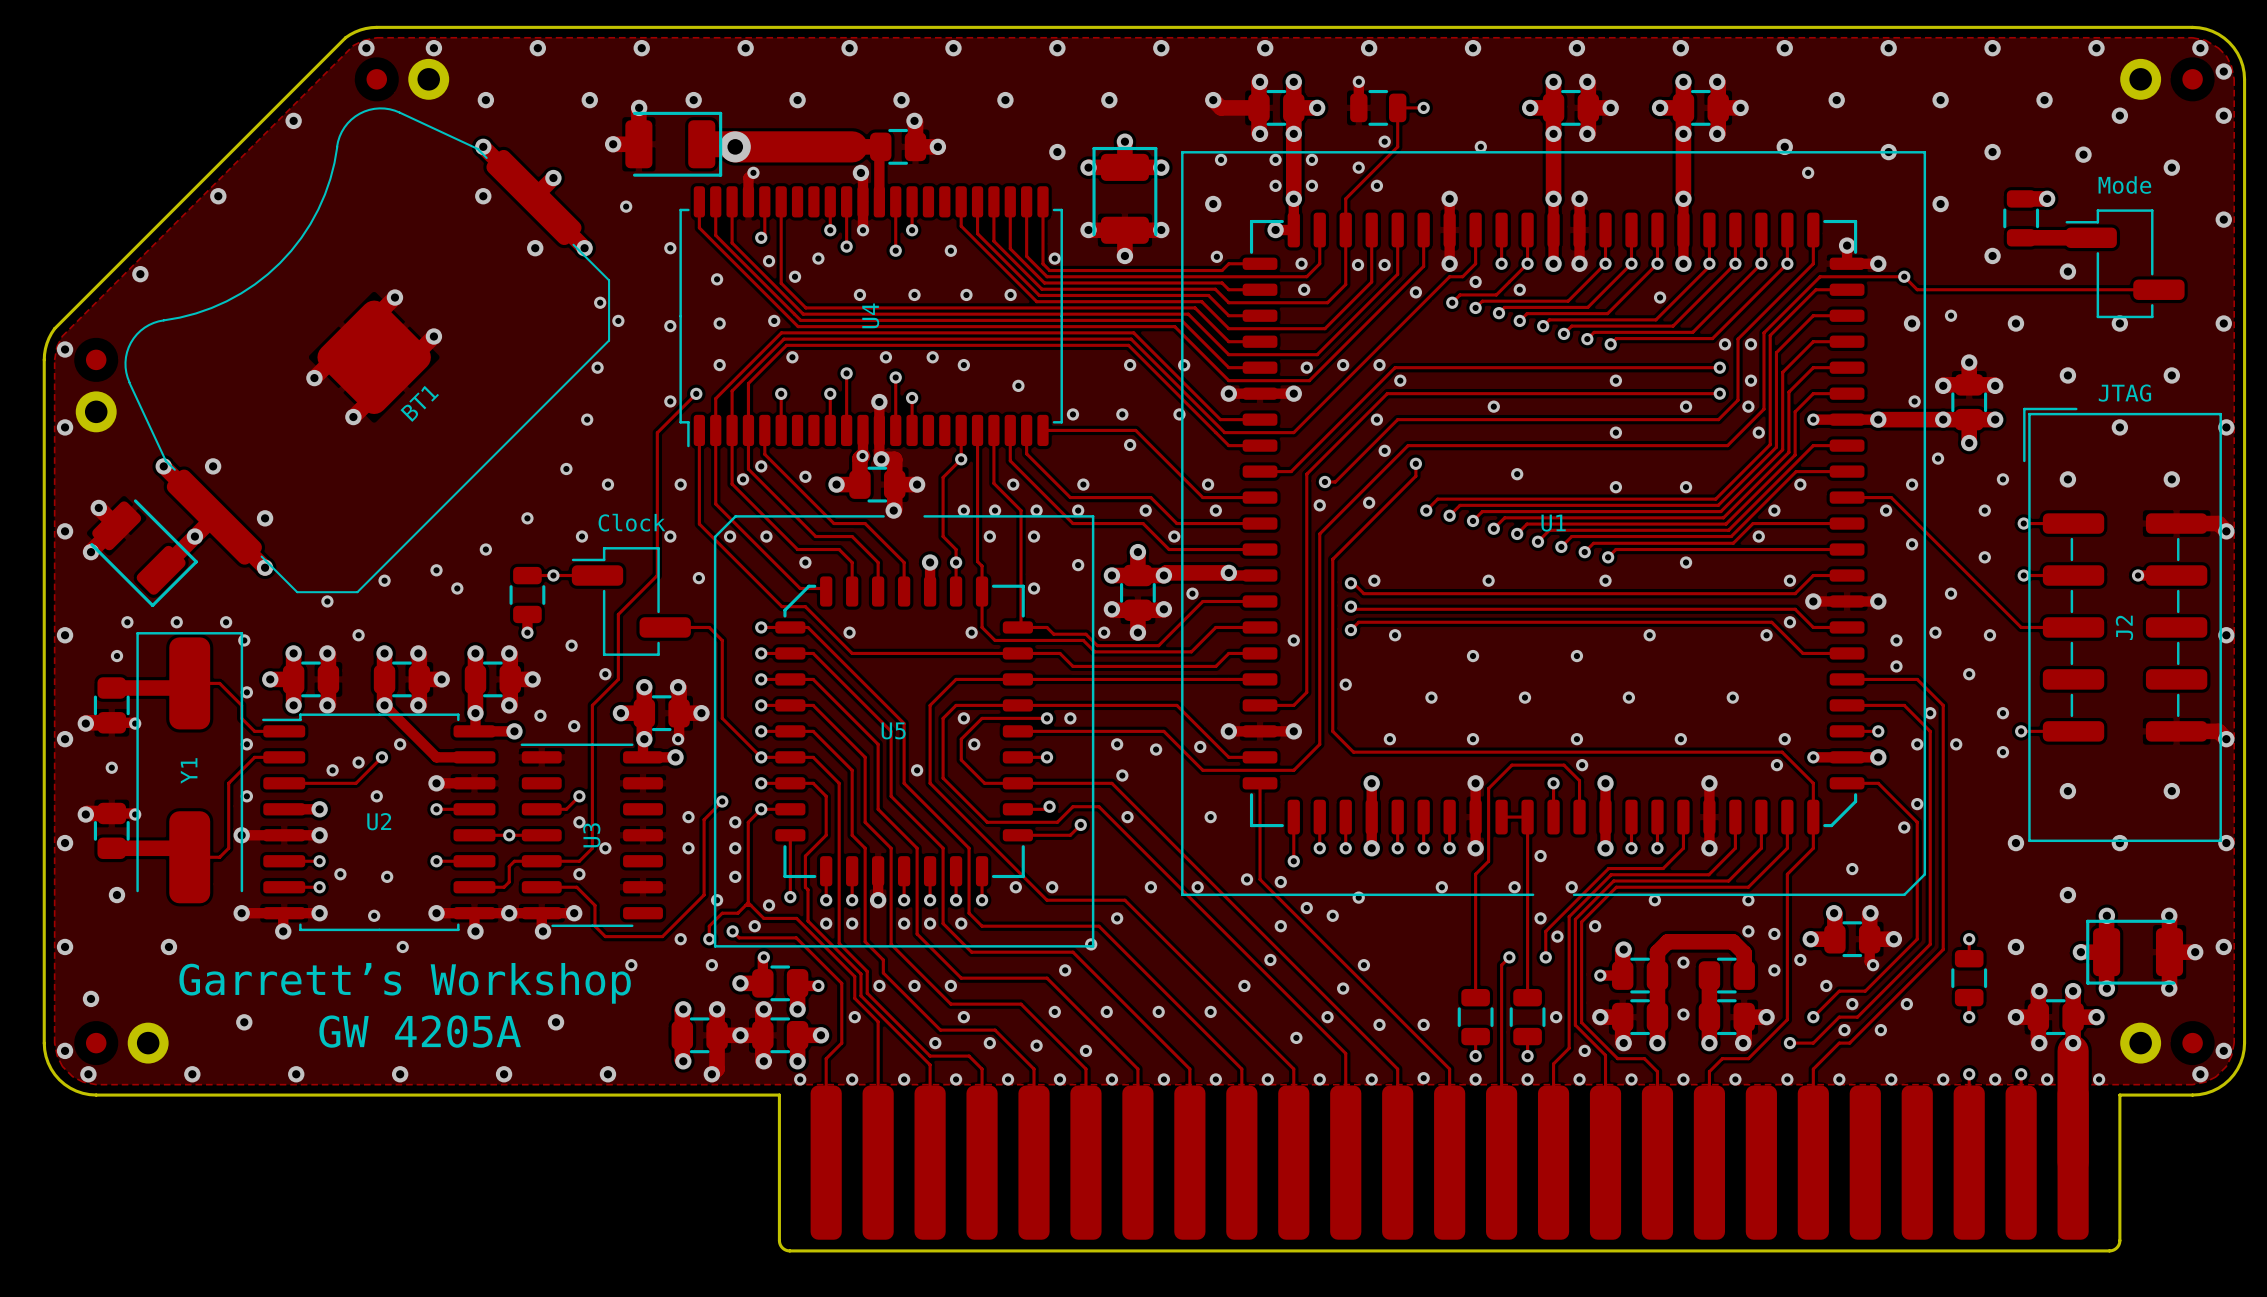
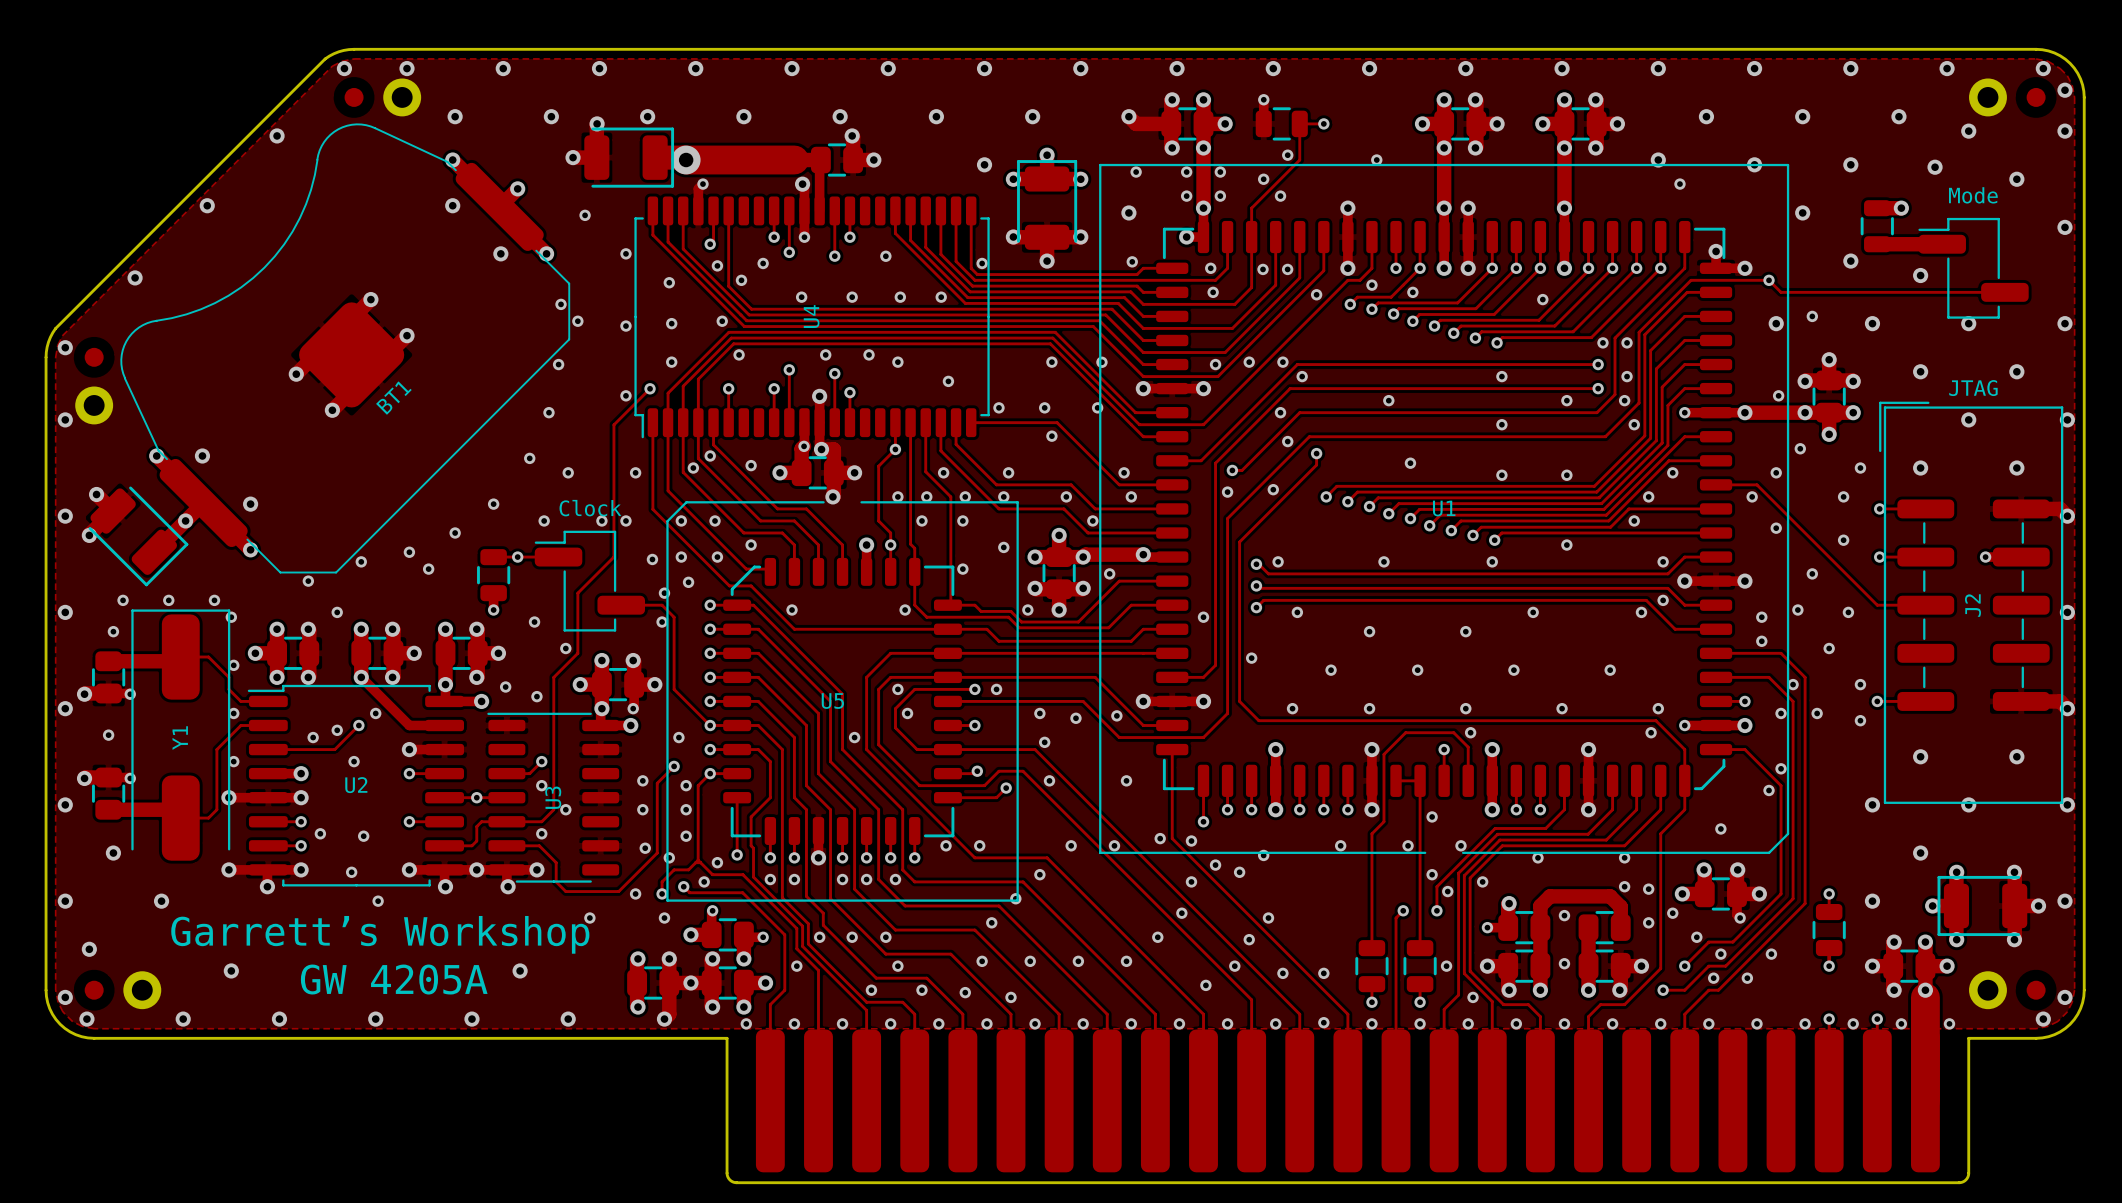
via: none -> (601, 520)
via: none -> (681, 557)
via: none -> (717, 557)
via: none -> (688, 582)
via: none -> (664, 593)
via: none -> (662, 622)
via: none -> (678, 737)
via: none -> (645, 848)

